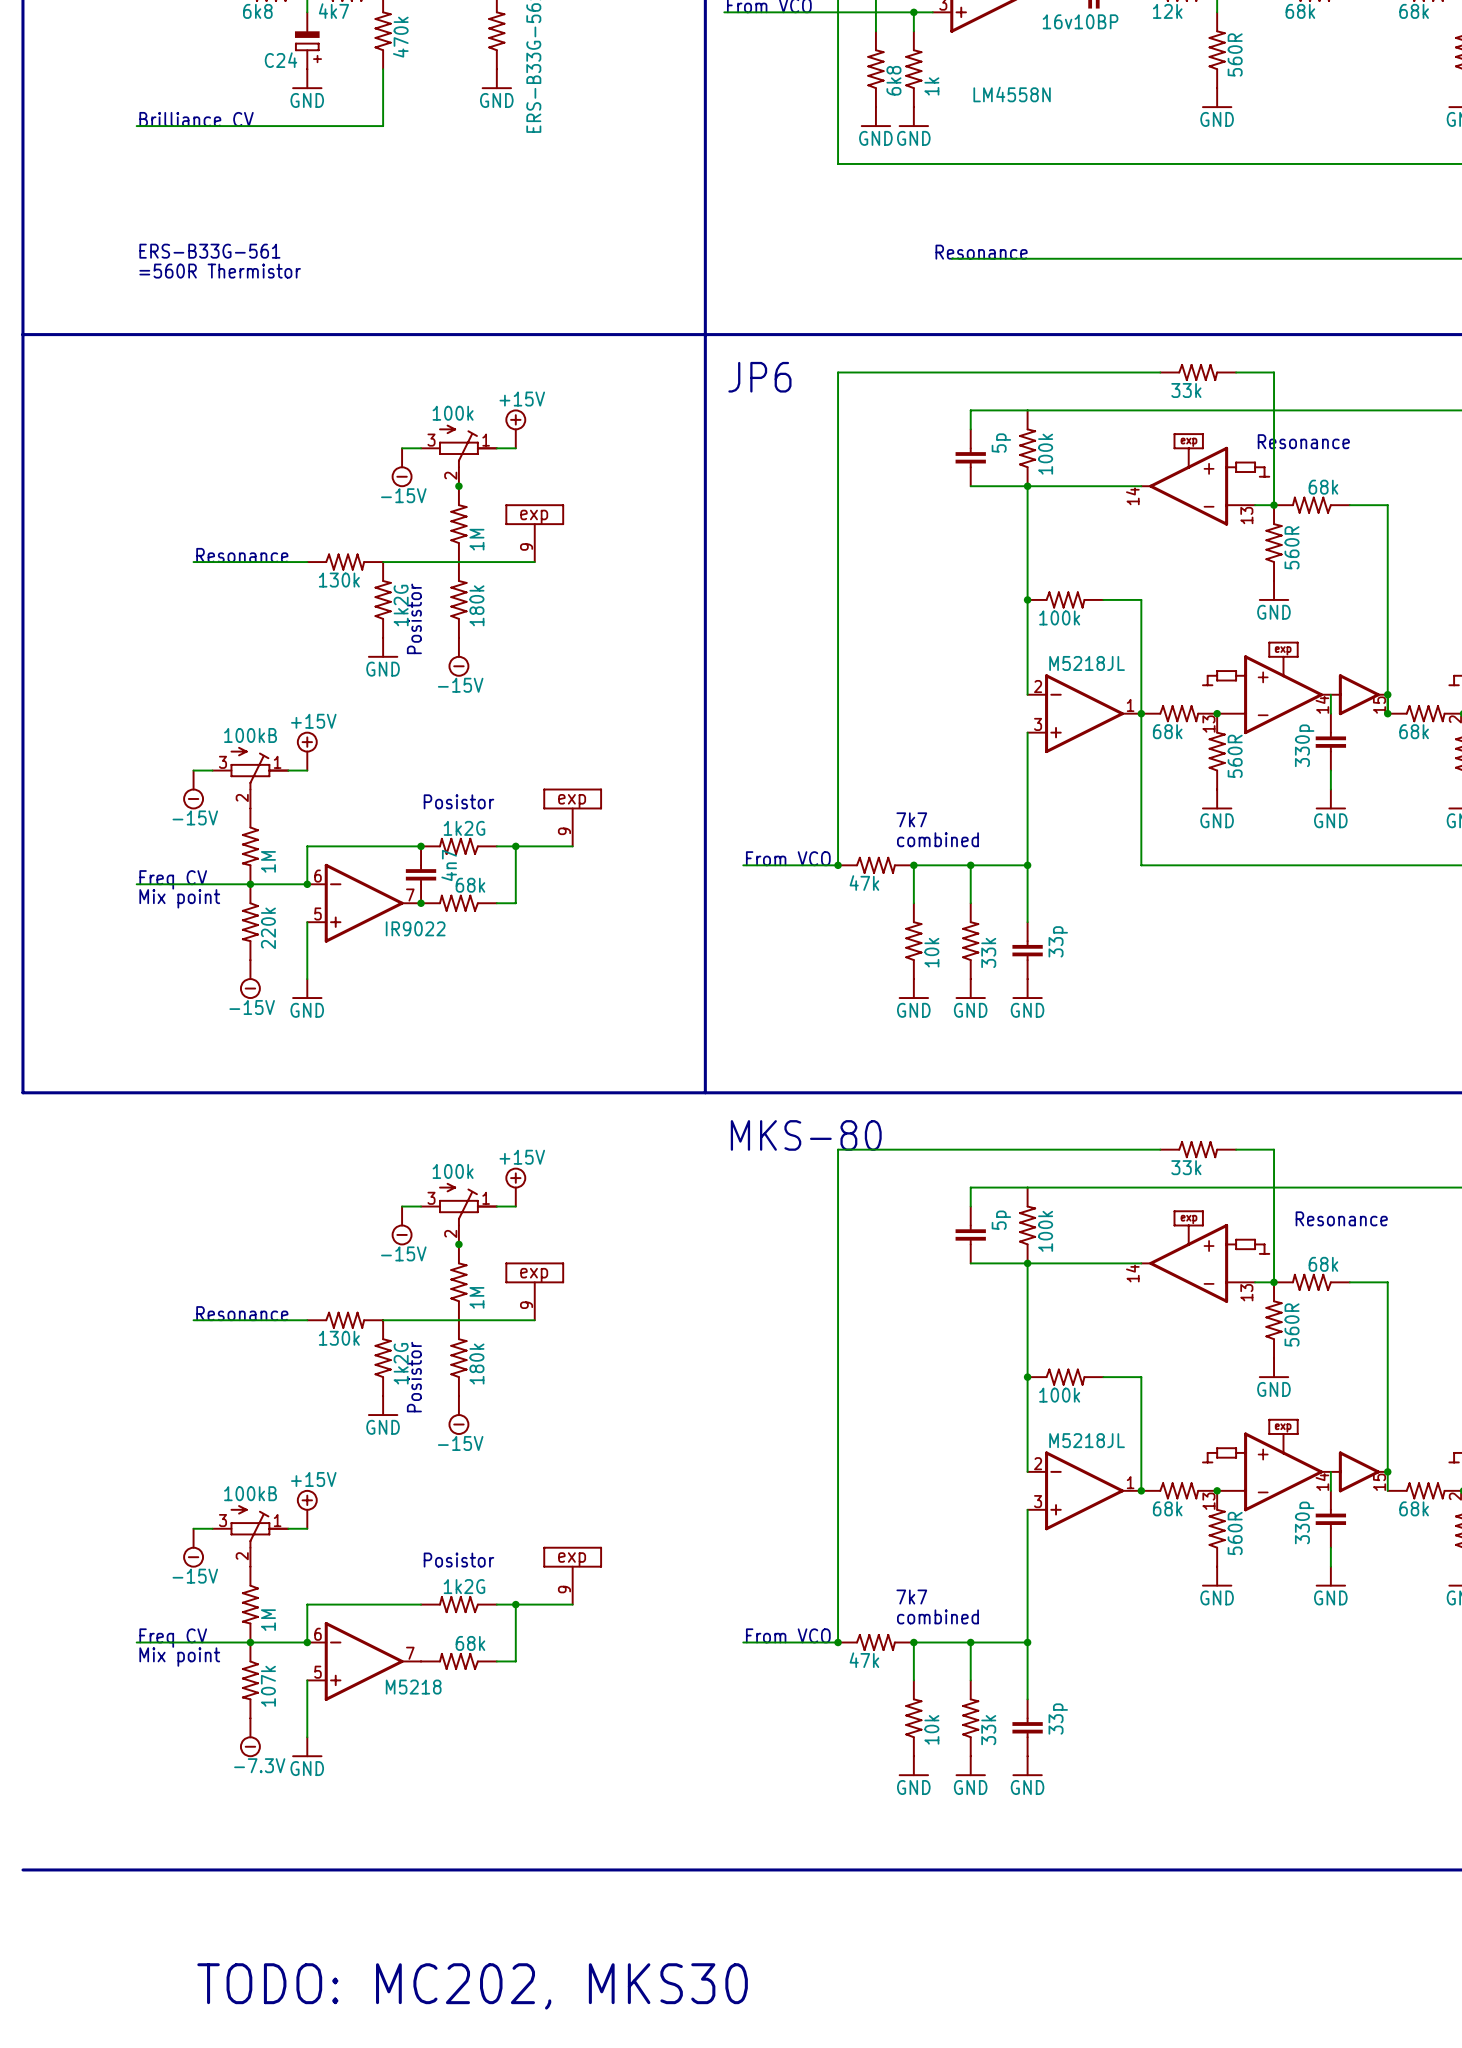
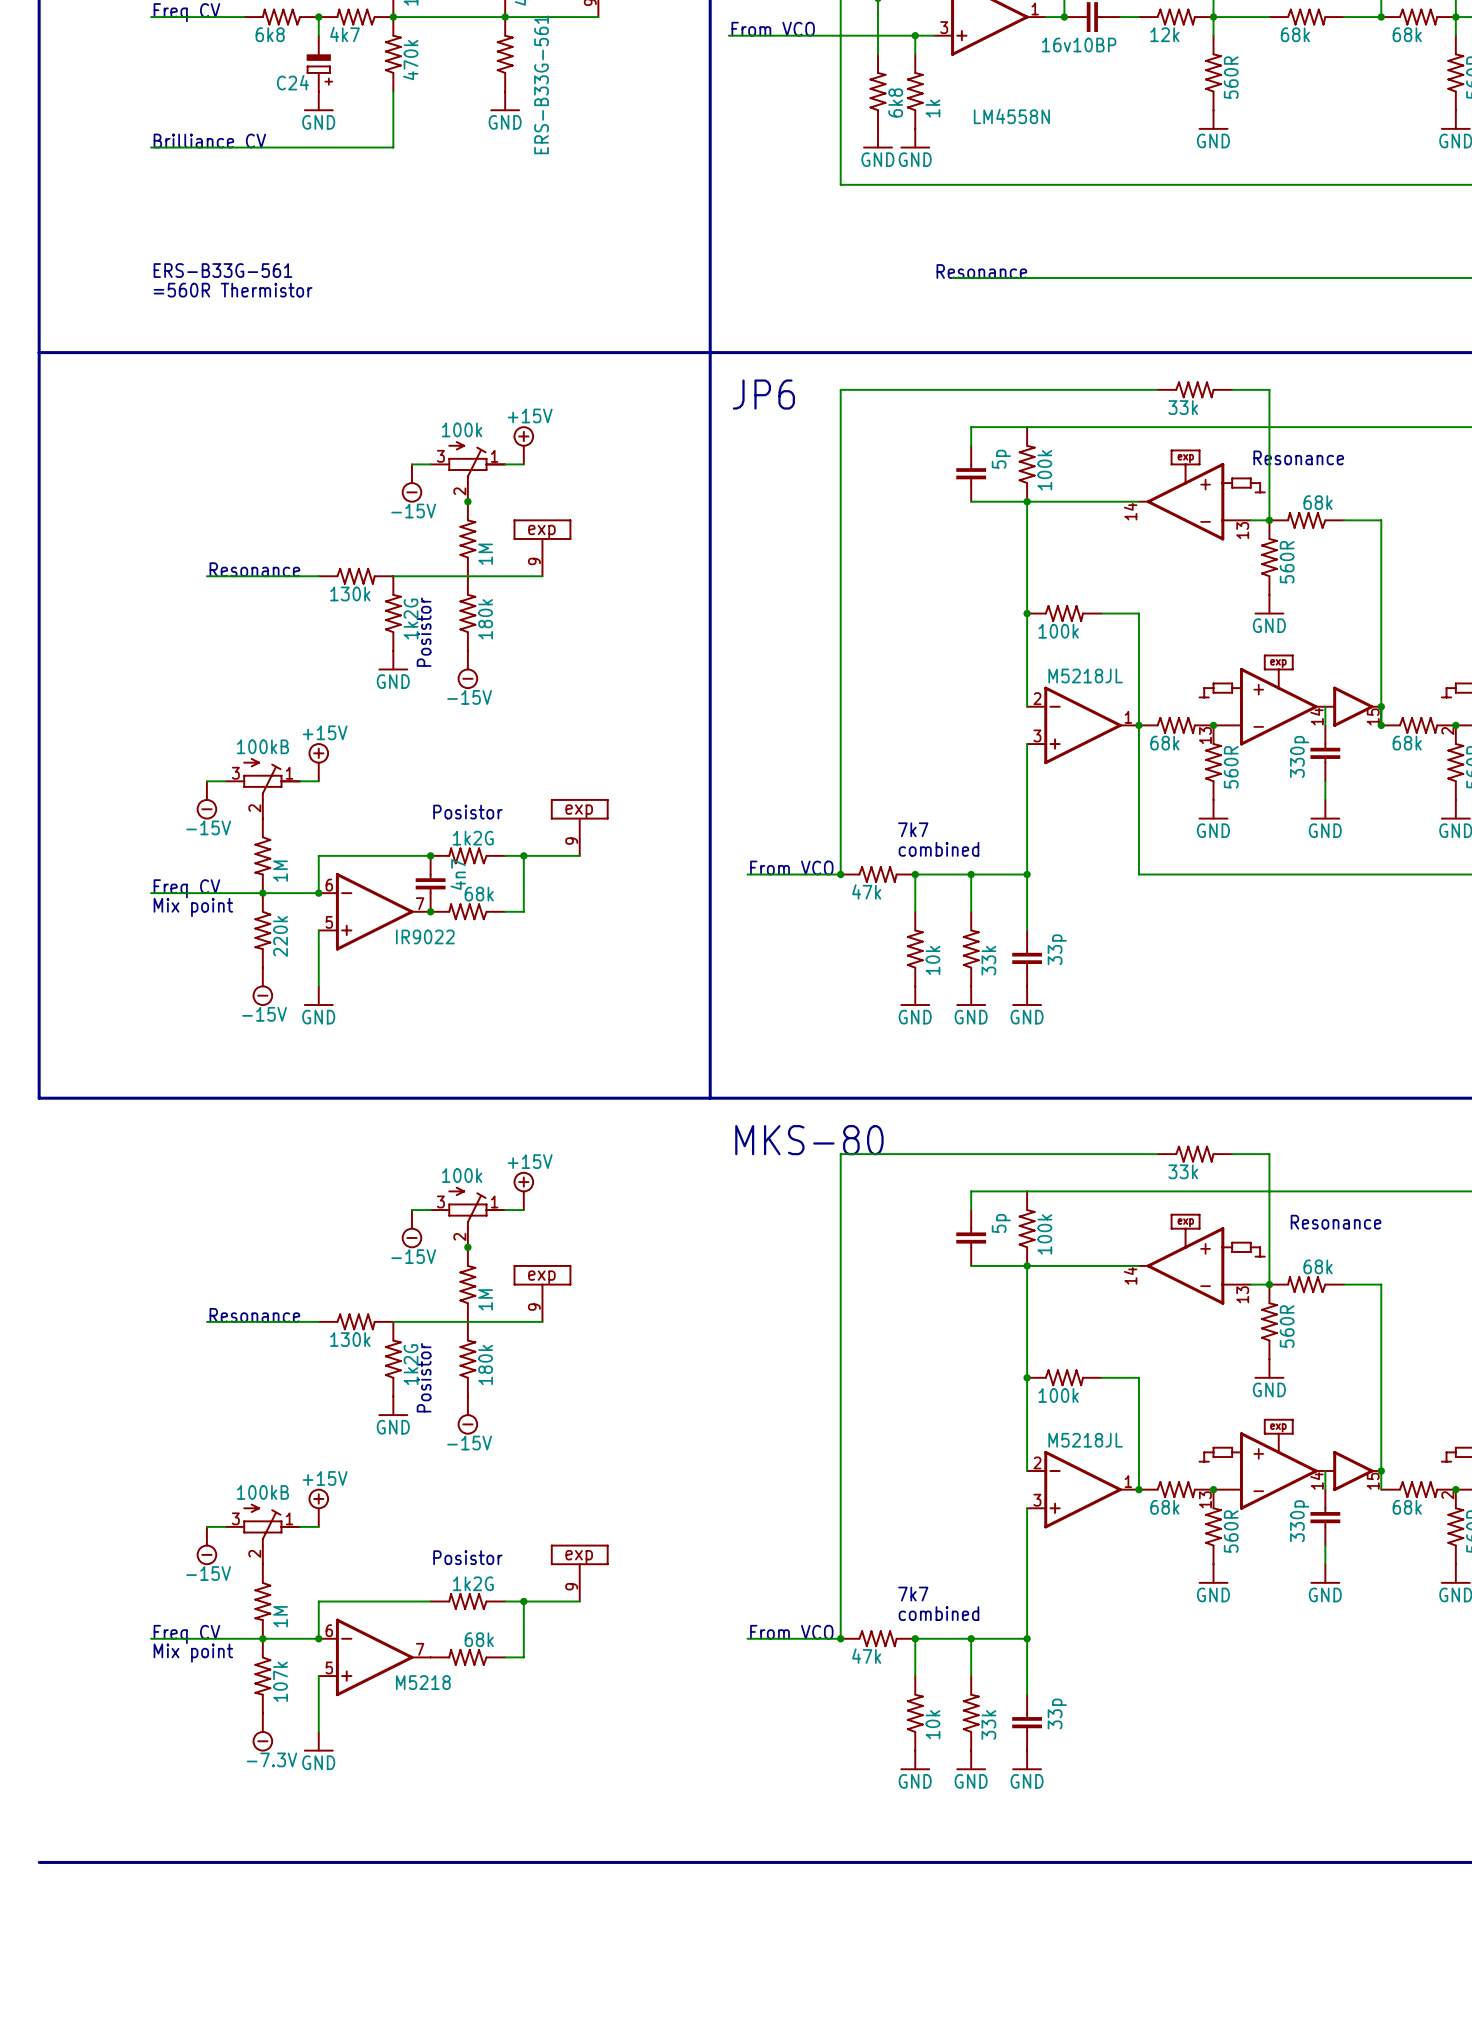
text: TODO: MC202, MKS30 (472, 1986) -> none

